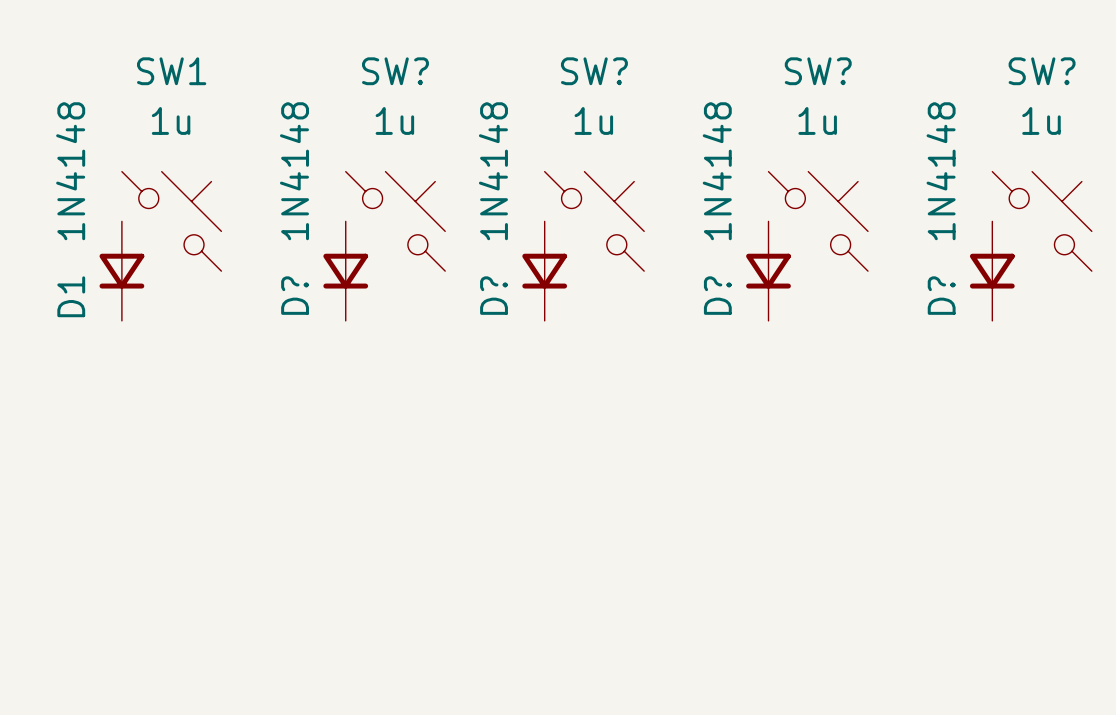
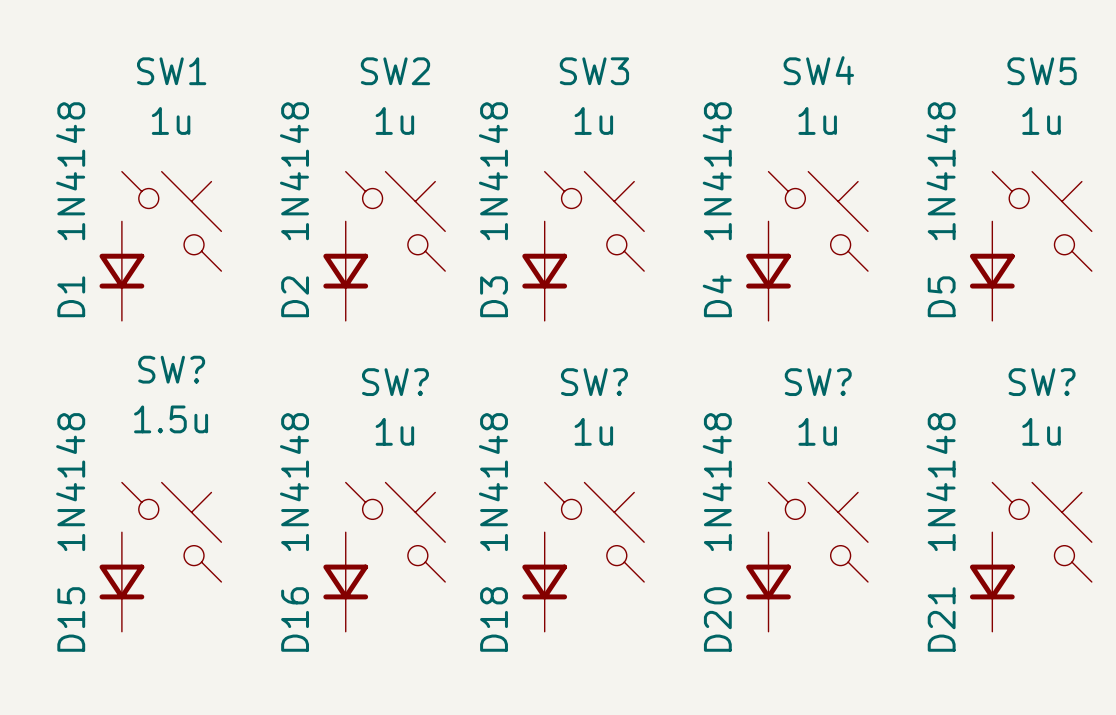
SW? name: SW? (395, 71) -> SW2 (395, 71)
SW? name: SW? (594, 71) -> SW3 (594, 71)
SW? name: SW? (818, 71) -> SW4 (818, 70)
SW? name: SW? (1042, 71) -> SW5 (1042, 71)
D? name: D? (295, 295) -> D2 (295, 296)
D? name: D? (494, 295) -> D3 (494, 296)
D? name: D? (717, 295) -> D4 (717, 296)
D? name: D? (941, 295) -> D5 (941, 296)
SW?: none -> 1.5u (171, 532)
SW?: none -> 1u (395, 532)
SW?: none -> 1u (594, 532)
SW?: none -> 1u (818, 532)
SW?: none -> 1u (1042, 532)
D15: none -> 1N4148 (121, 581)
D16: none -> 1N4148 (345, 581)
D18: none -> 1N4148 (544, 581)
D20: none -> 1N4148 (768, 581)
D21: none -> 1N4148 (992, 581)

